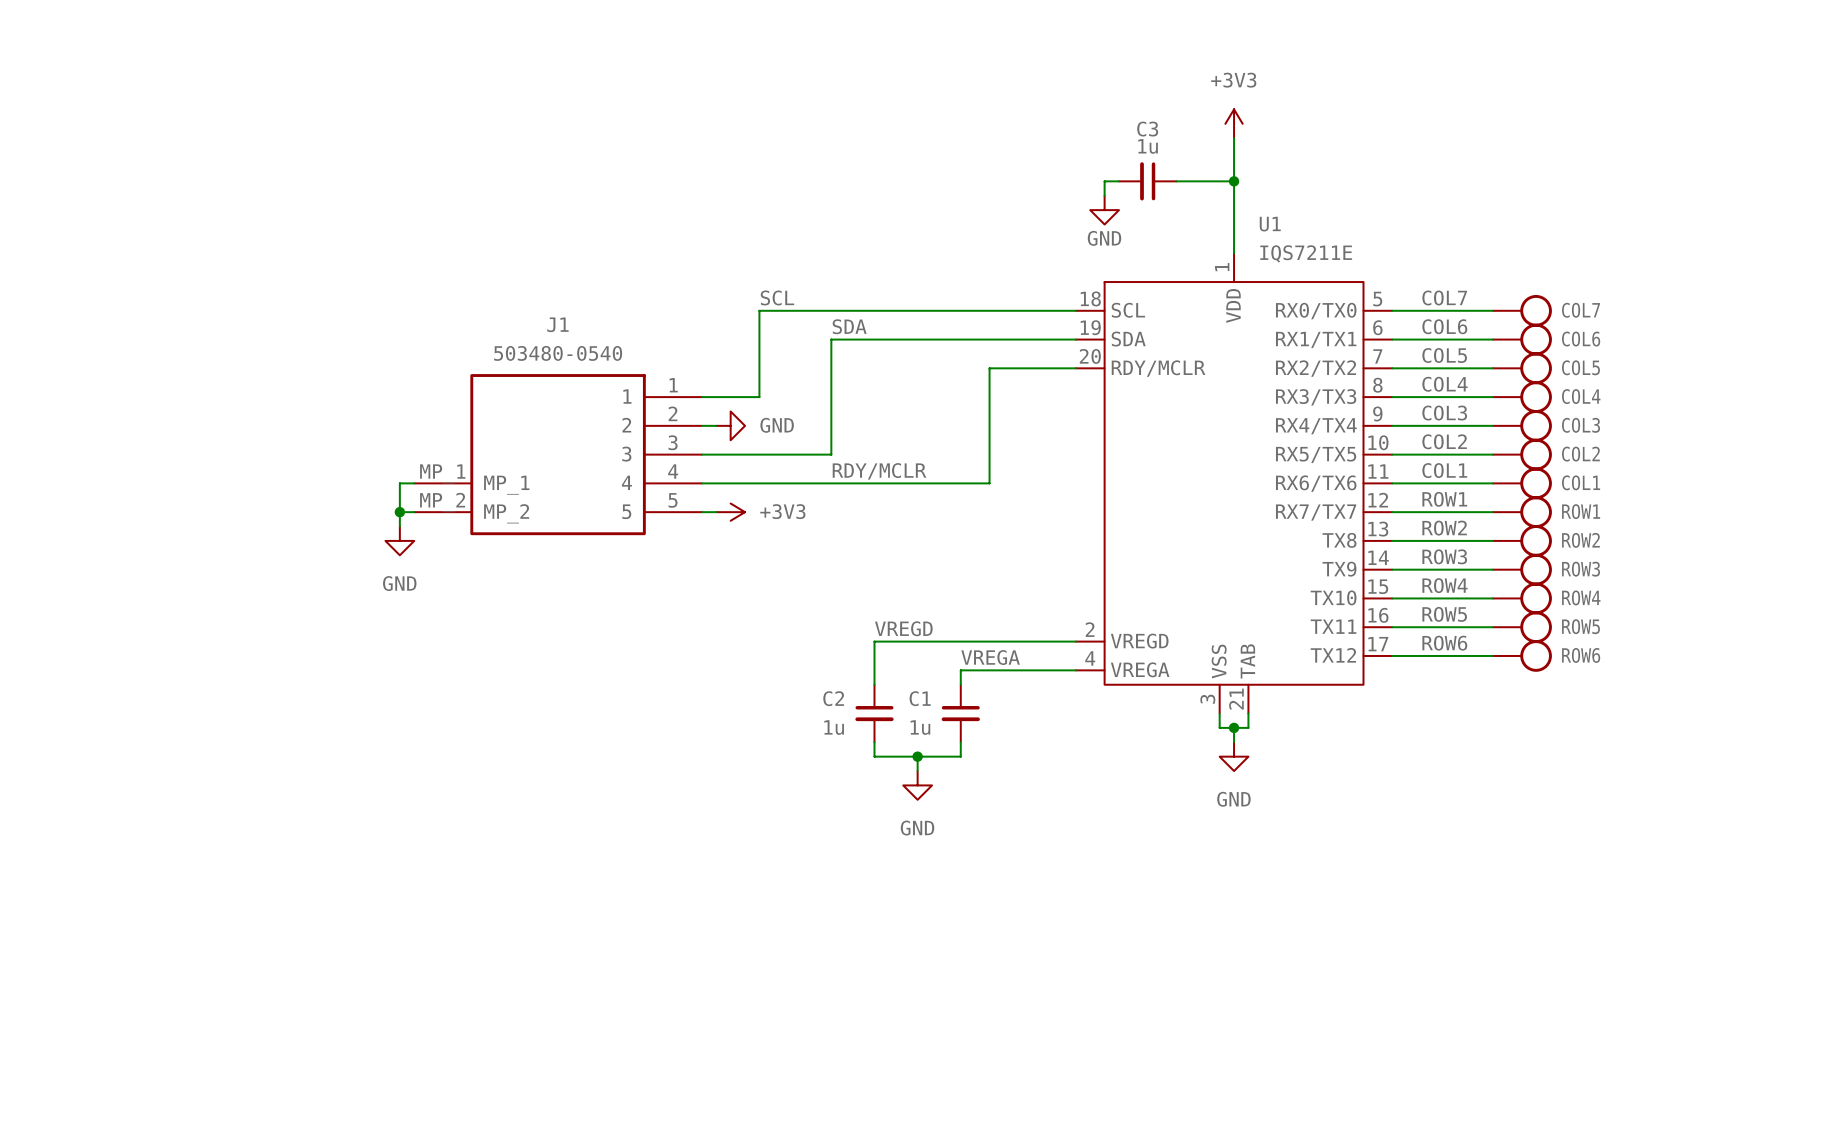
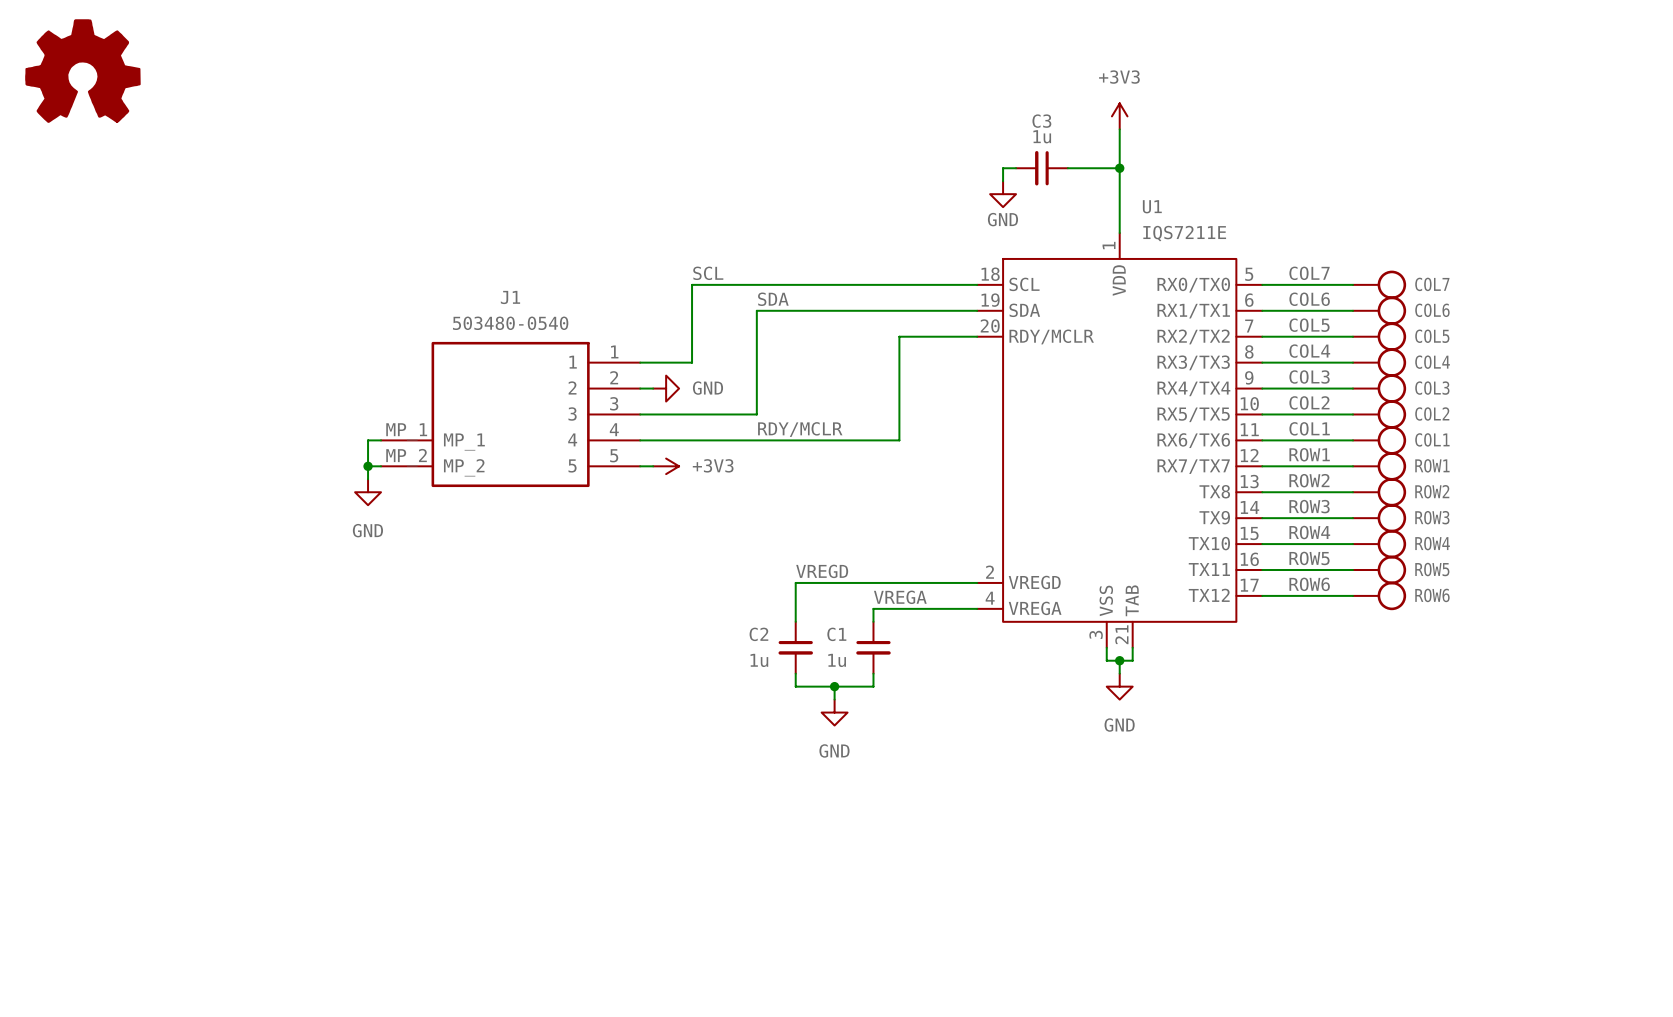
part: none -> (82, 71)

